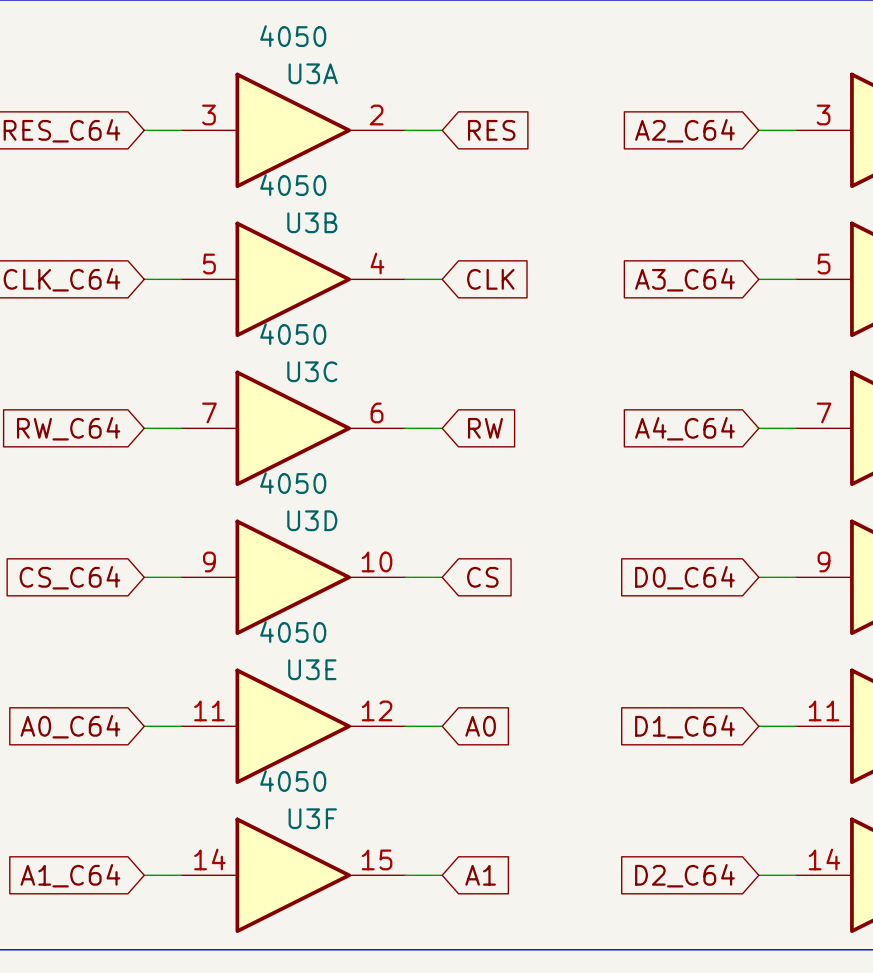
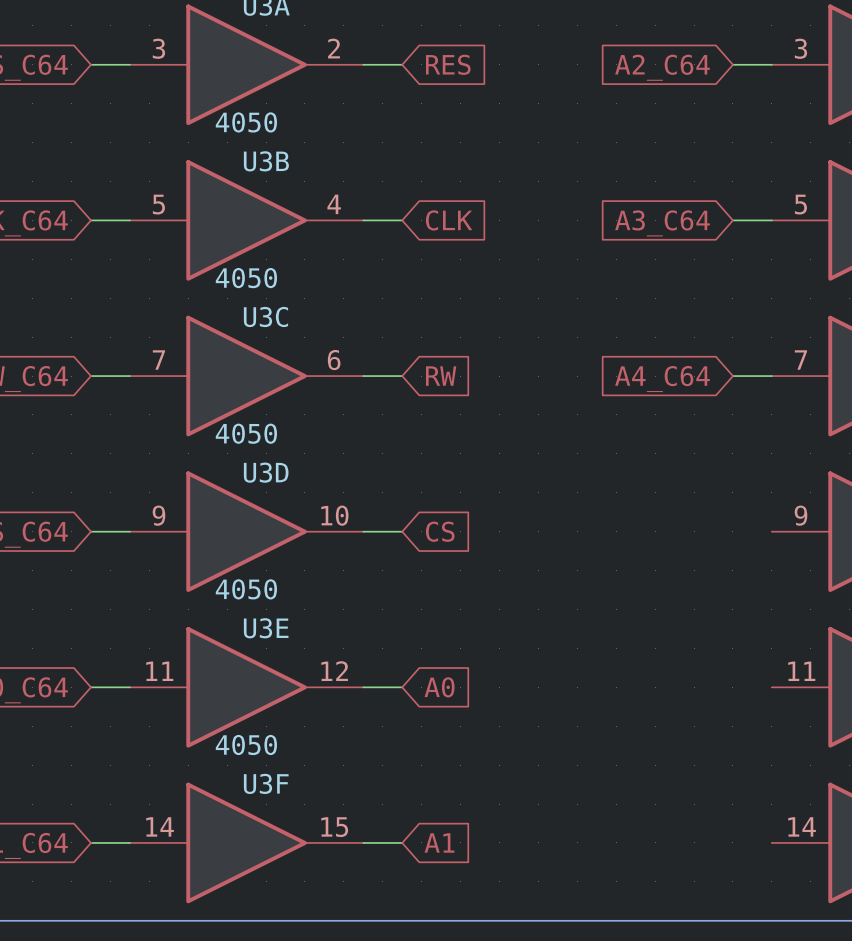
global label: D0_C64 (684, 577) -> none
wire: (758, 577) (796, 577) -> none
global label: D1_C64 (684, 726) -> none
wire: (758, 726) (796, 726) -> none
global label: D2_C64 (684, 875) -> none
wire: (758, 875) (796, 875) -> none

